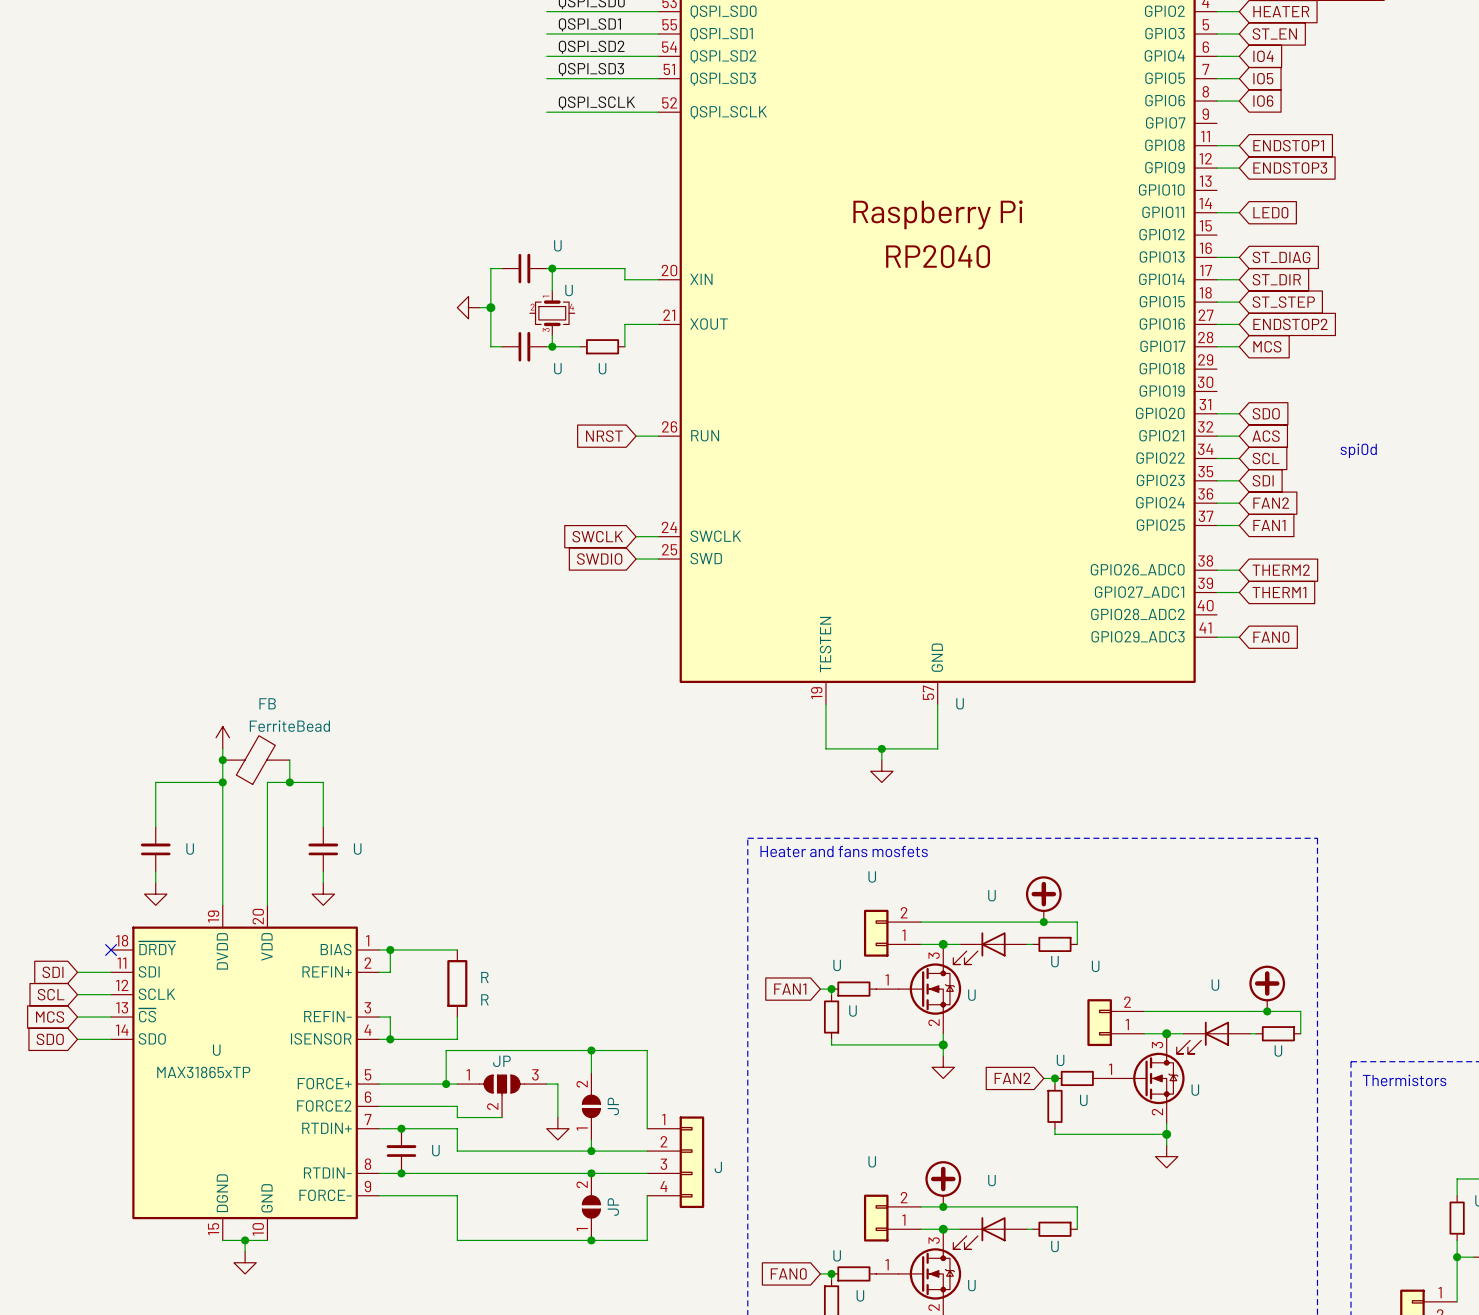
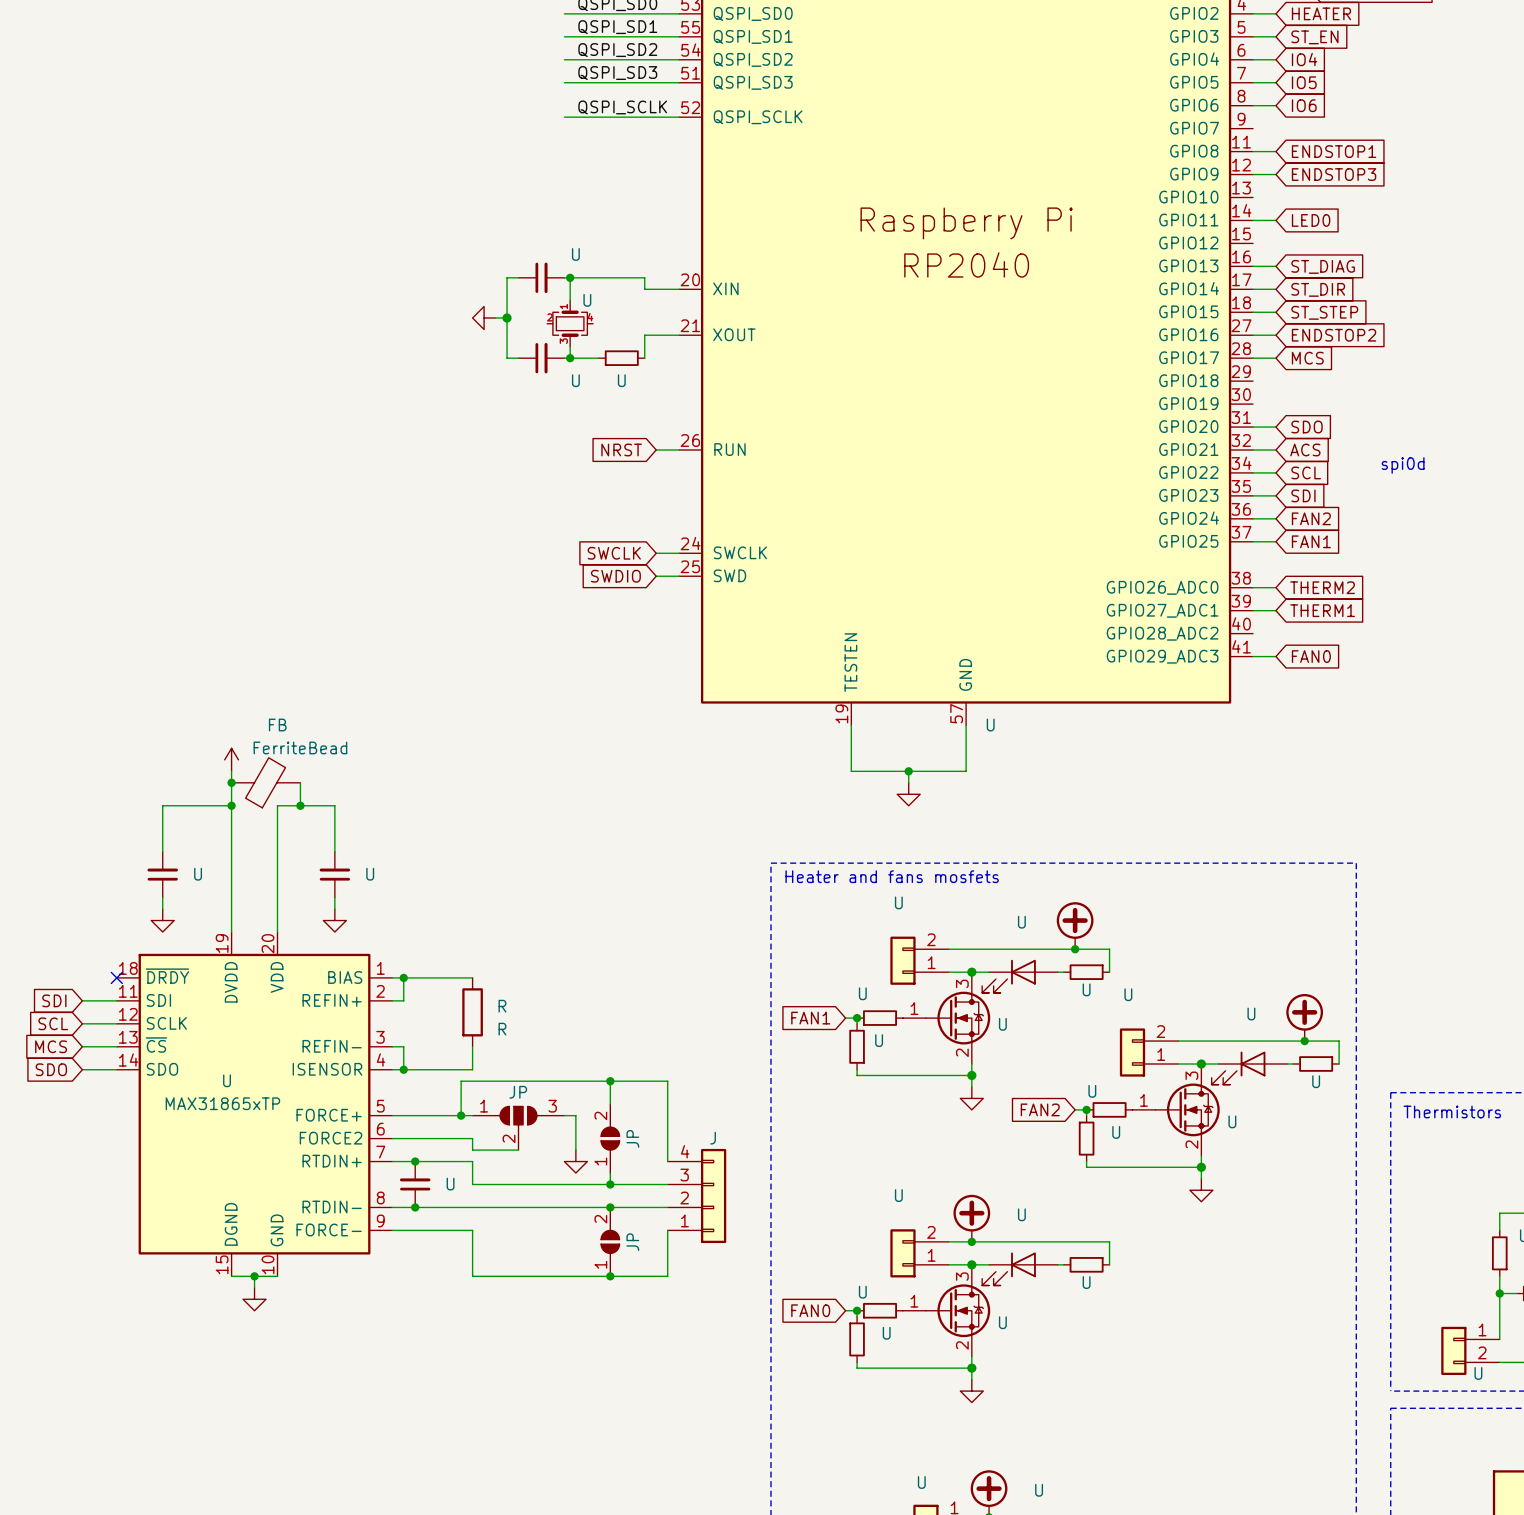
J flip: as is (691, 1162) -> up-down (713, 1195)
J name position: J (718, 1167) -> J (713, 1138)

